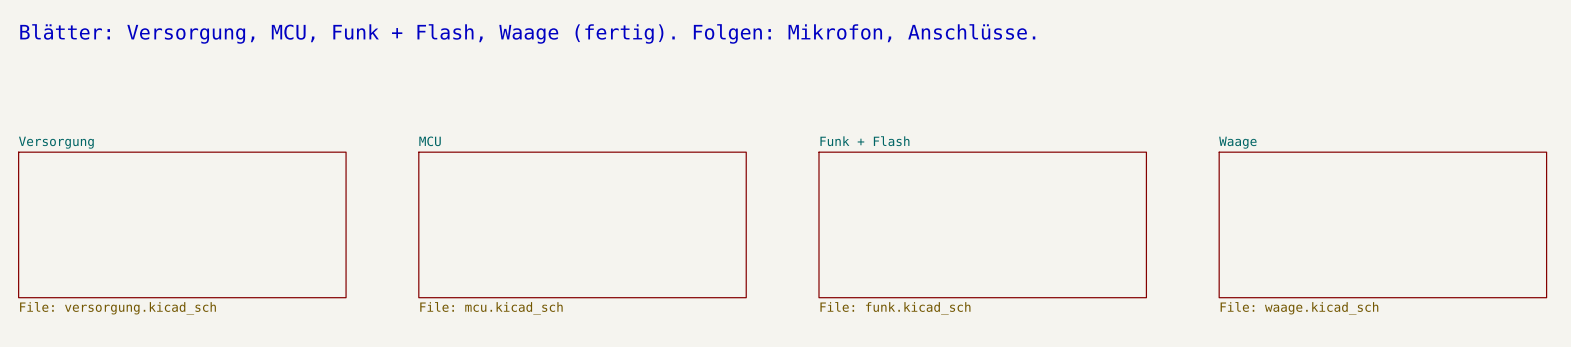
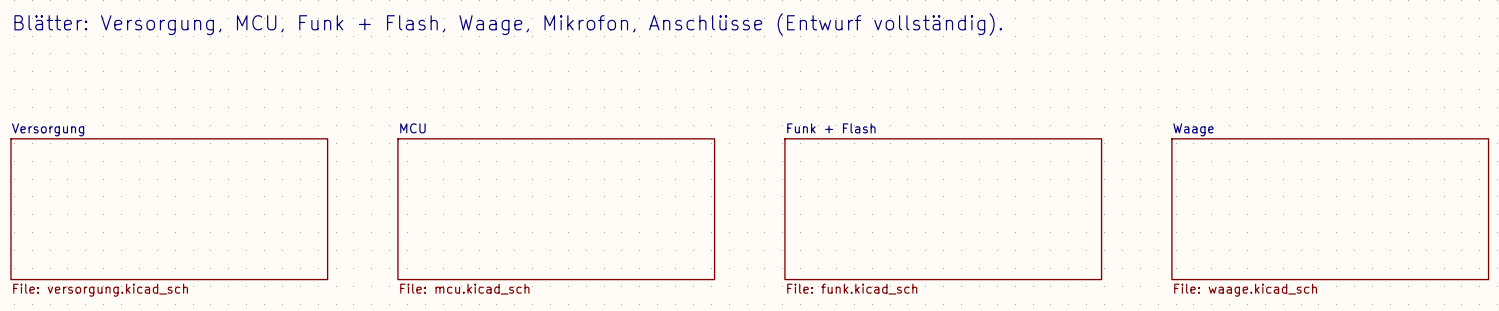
text: Blätter: Versorgung, MCU, Funk + Flash, Waage (fertig). Folgen: Mikrofon, Anschlüsse. (527, 33) -> Blätter: Versorgung, MCU, Funk + Flash, Waage, Mikrofon, Anschlüsse (Entwurf vollständig). (508, 24)

